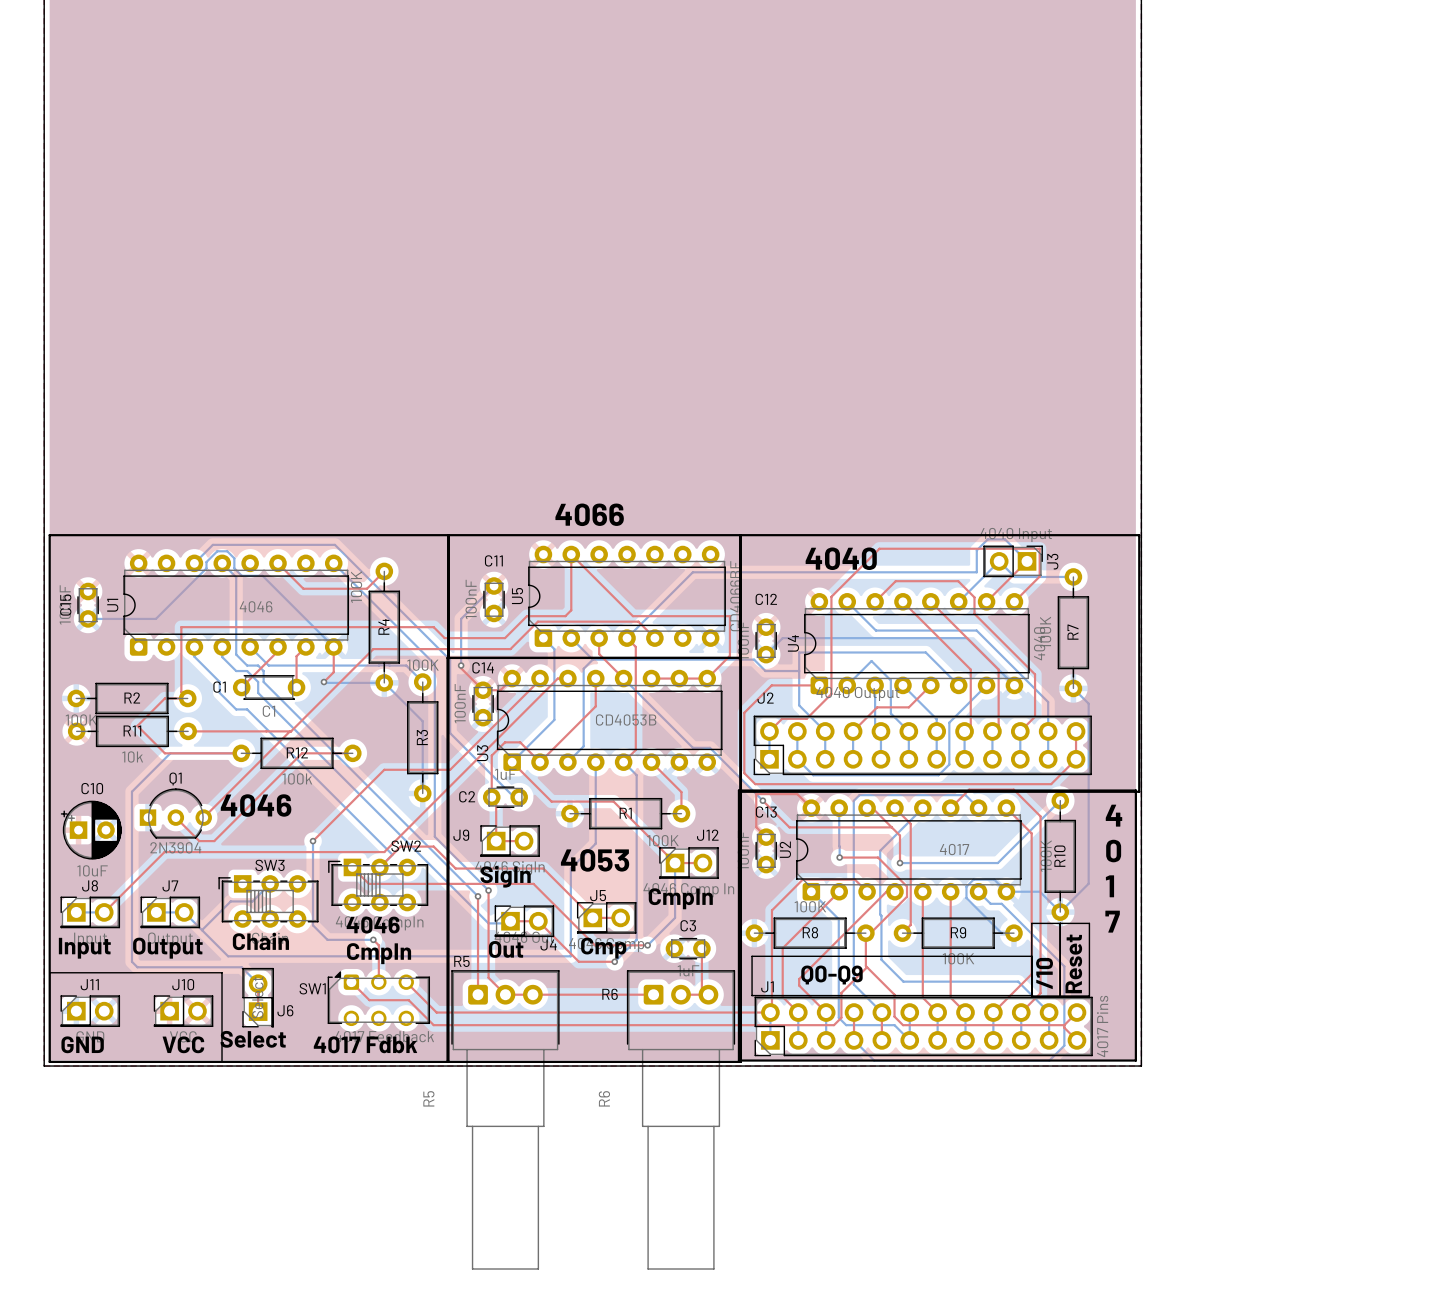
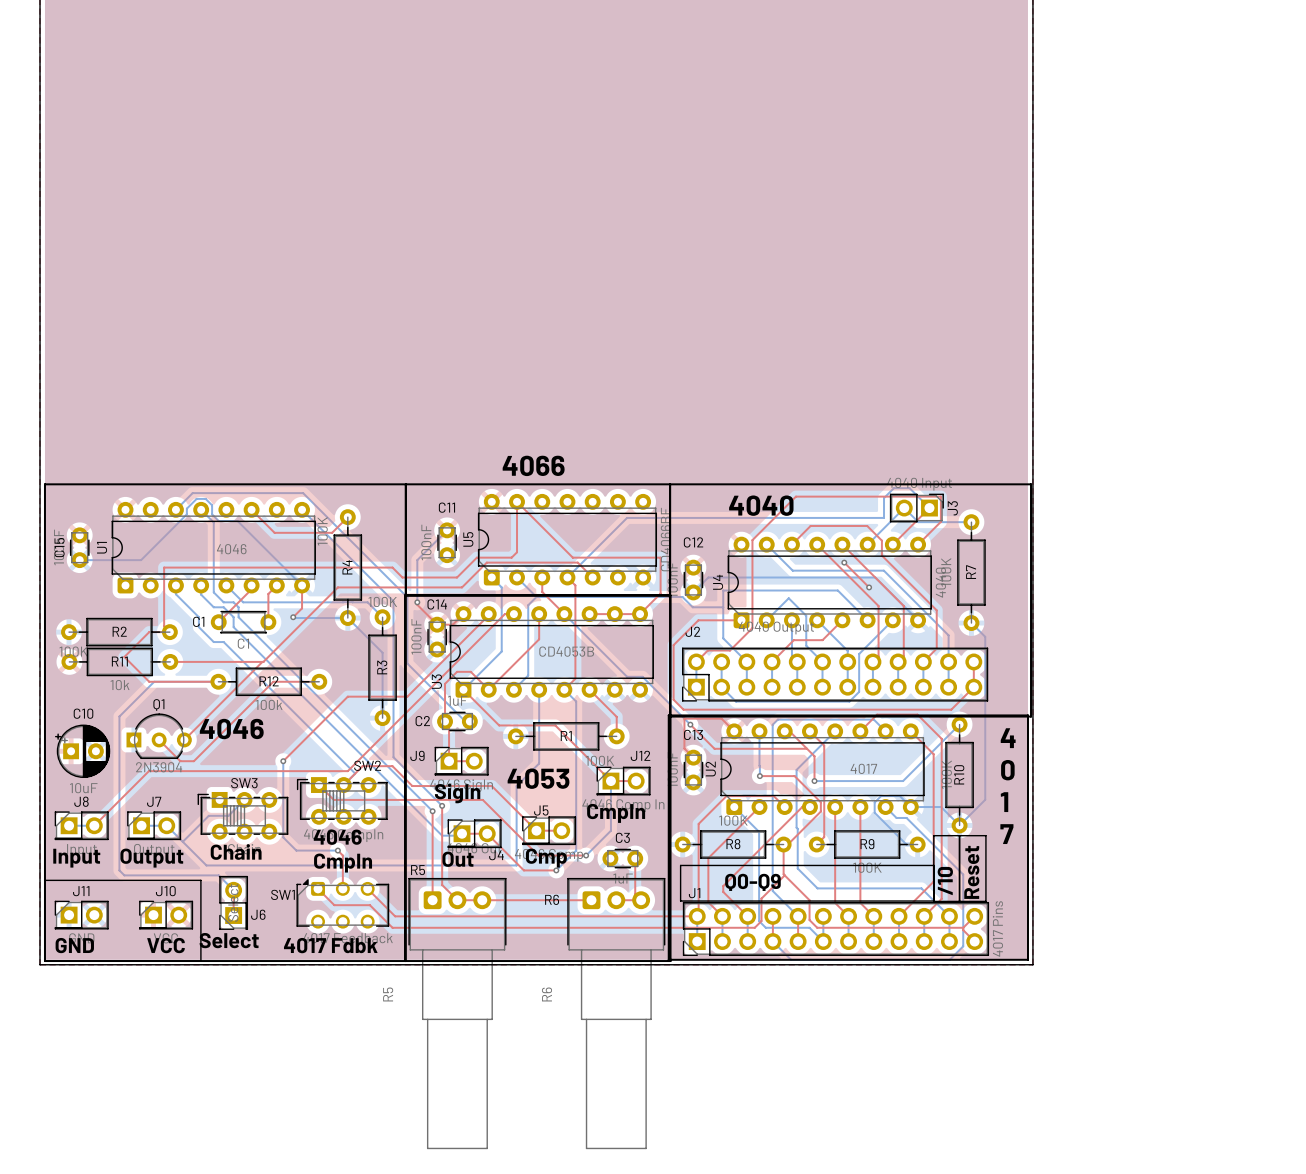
top track: none -> (844, 562) (869, 587)
via: none -> (844, 562)
via: none -> (869, 587)

